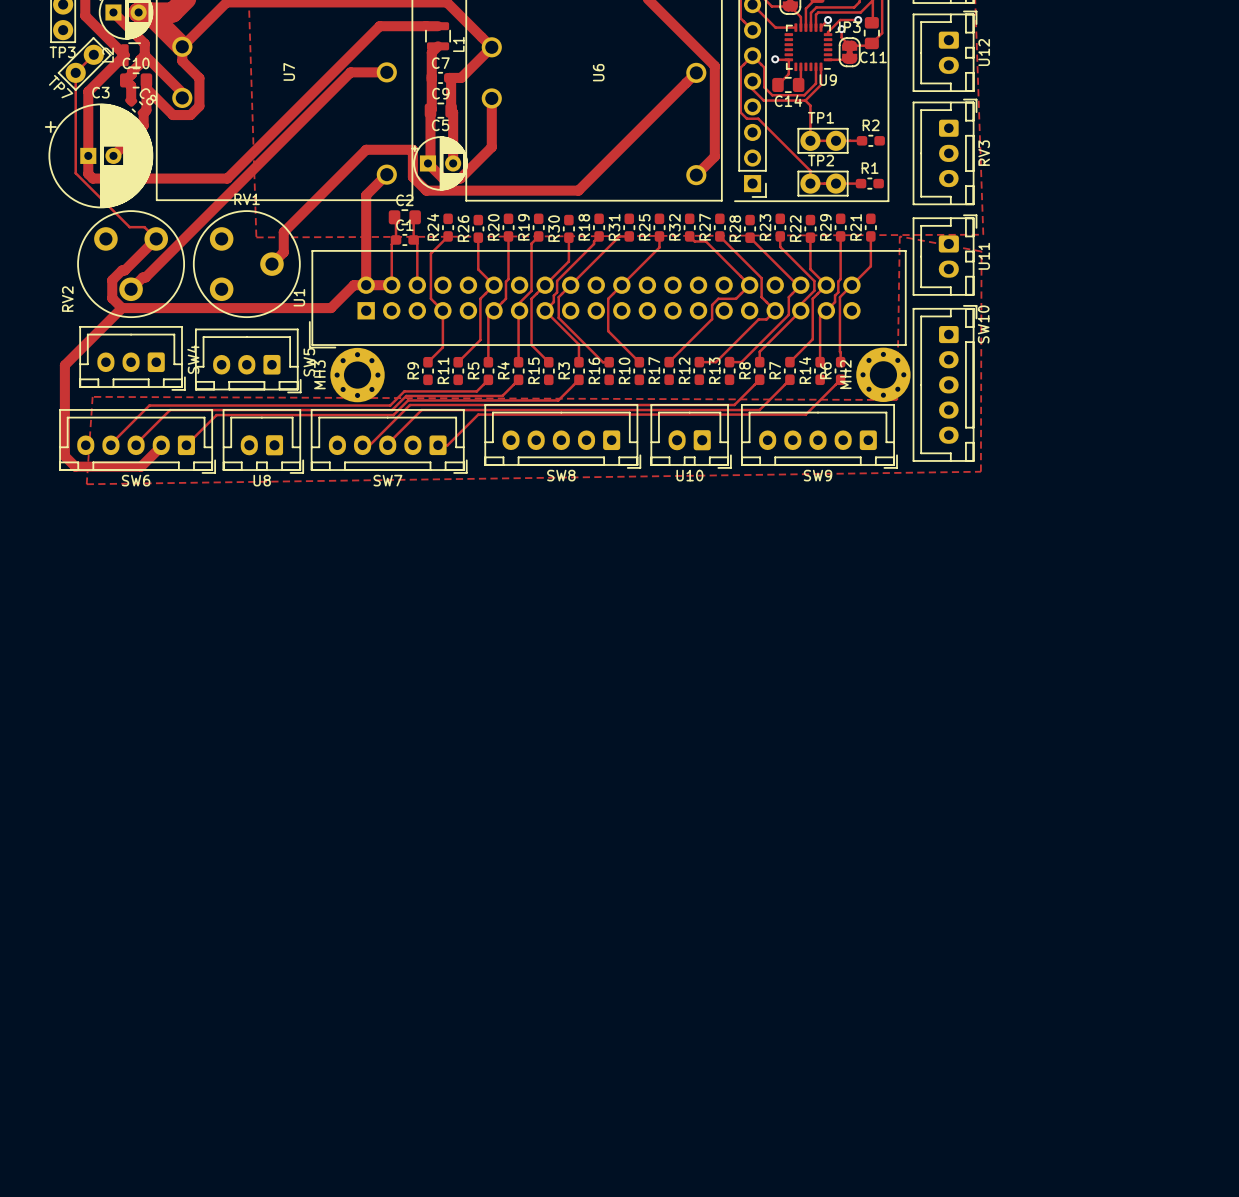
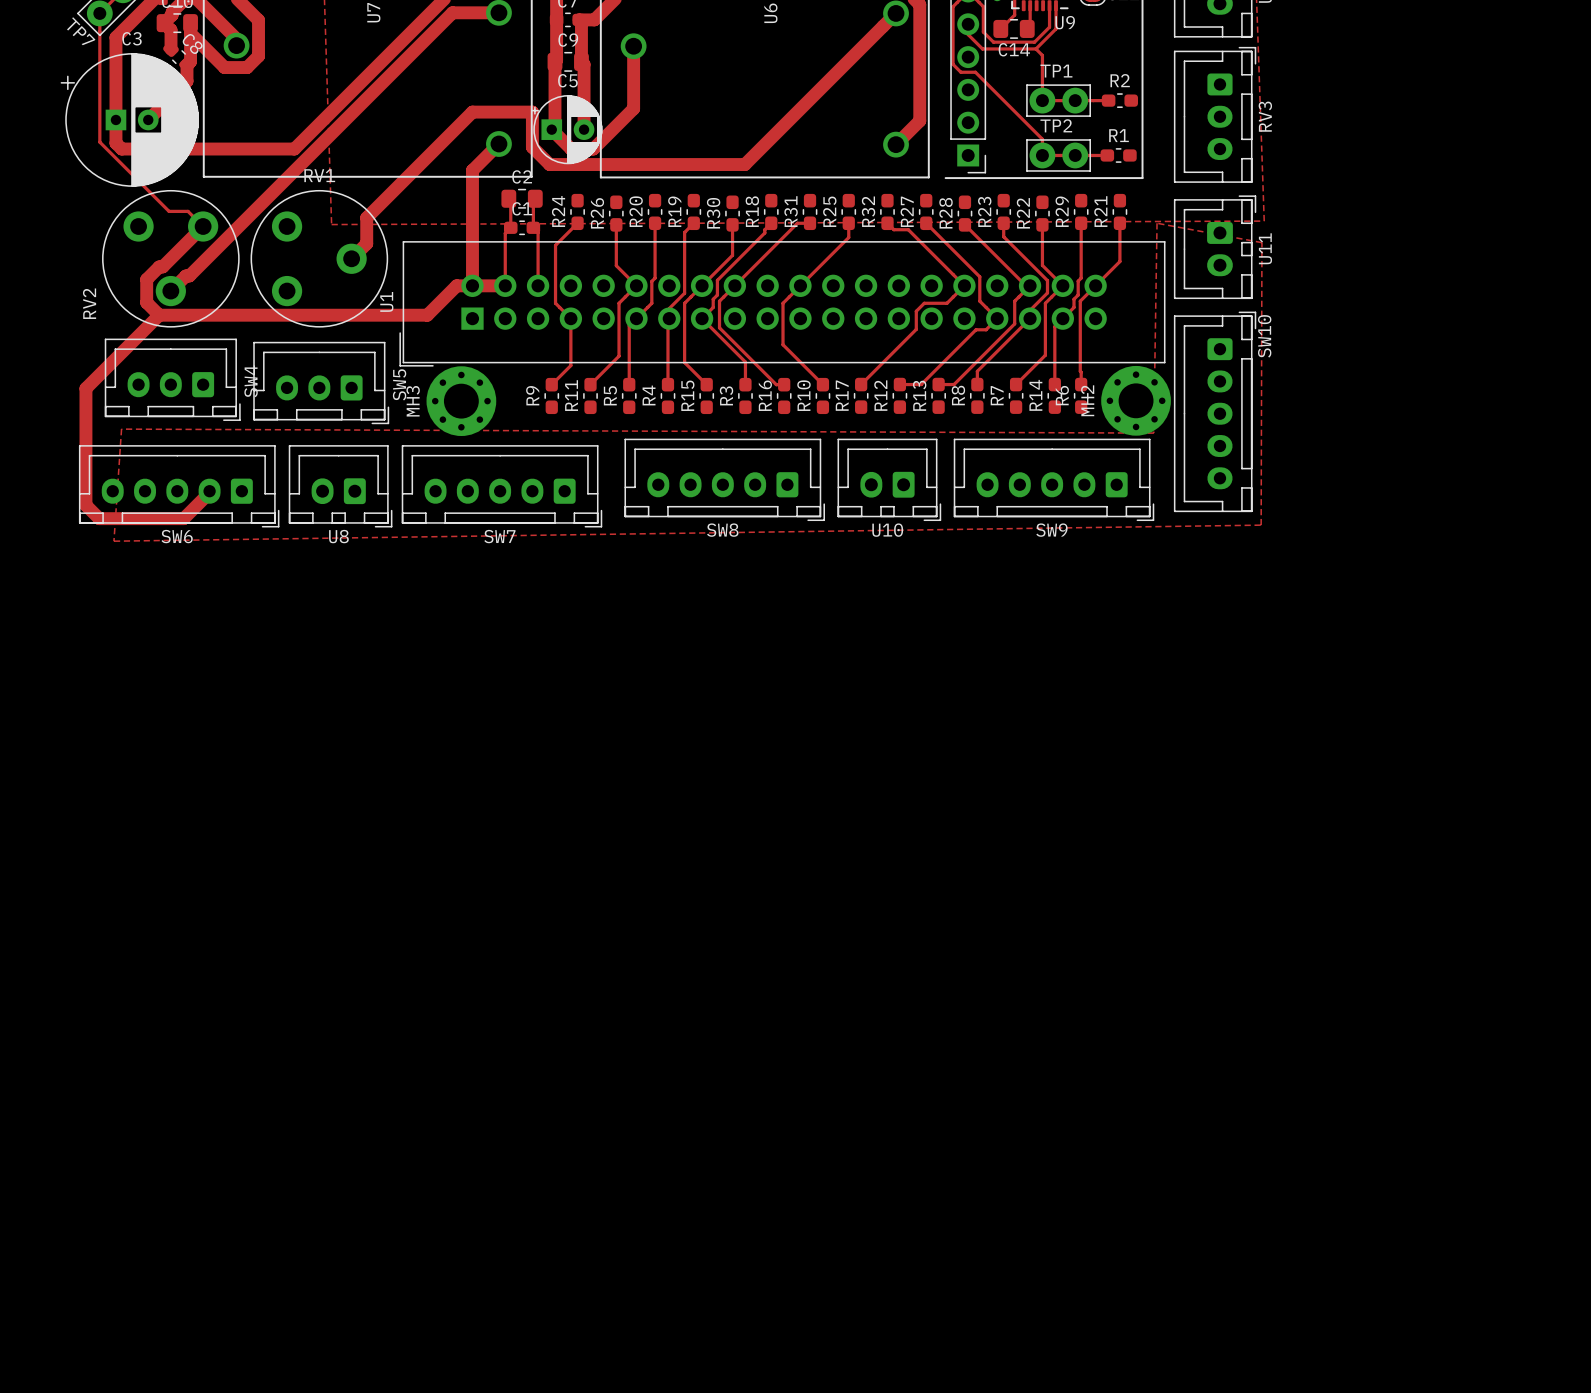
track: (488, 379) (476, 391) (404, 391) (390, 405) (149, 405) (110, 445) -> none
track: (518, 379) (502, 395) (406, 395) (392, 410) (170, 410) (136, 445) -> none
track: (578, 379) (558, 400) (408, 400) (393, 415) (216, 415) (186, 445) -> none
track: (759, 379) (734, 405) (410, 405) (369, 445) (362, 445) -> none
track: (789, 379) (759, 410) (421, 410) (387, 445) -> none
track: (840, 379) (805, 414) (478, 414) (447, 445) (438, 445) -> none

